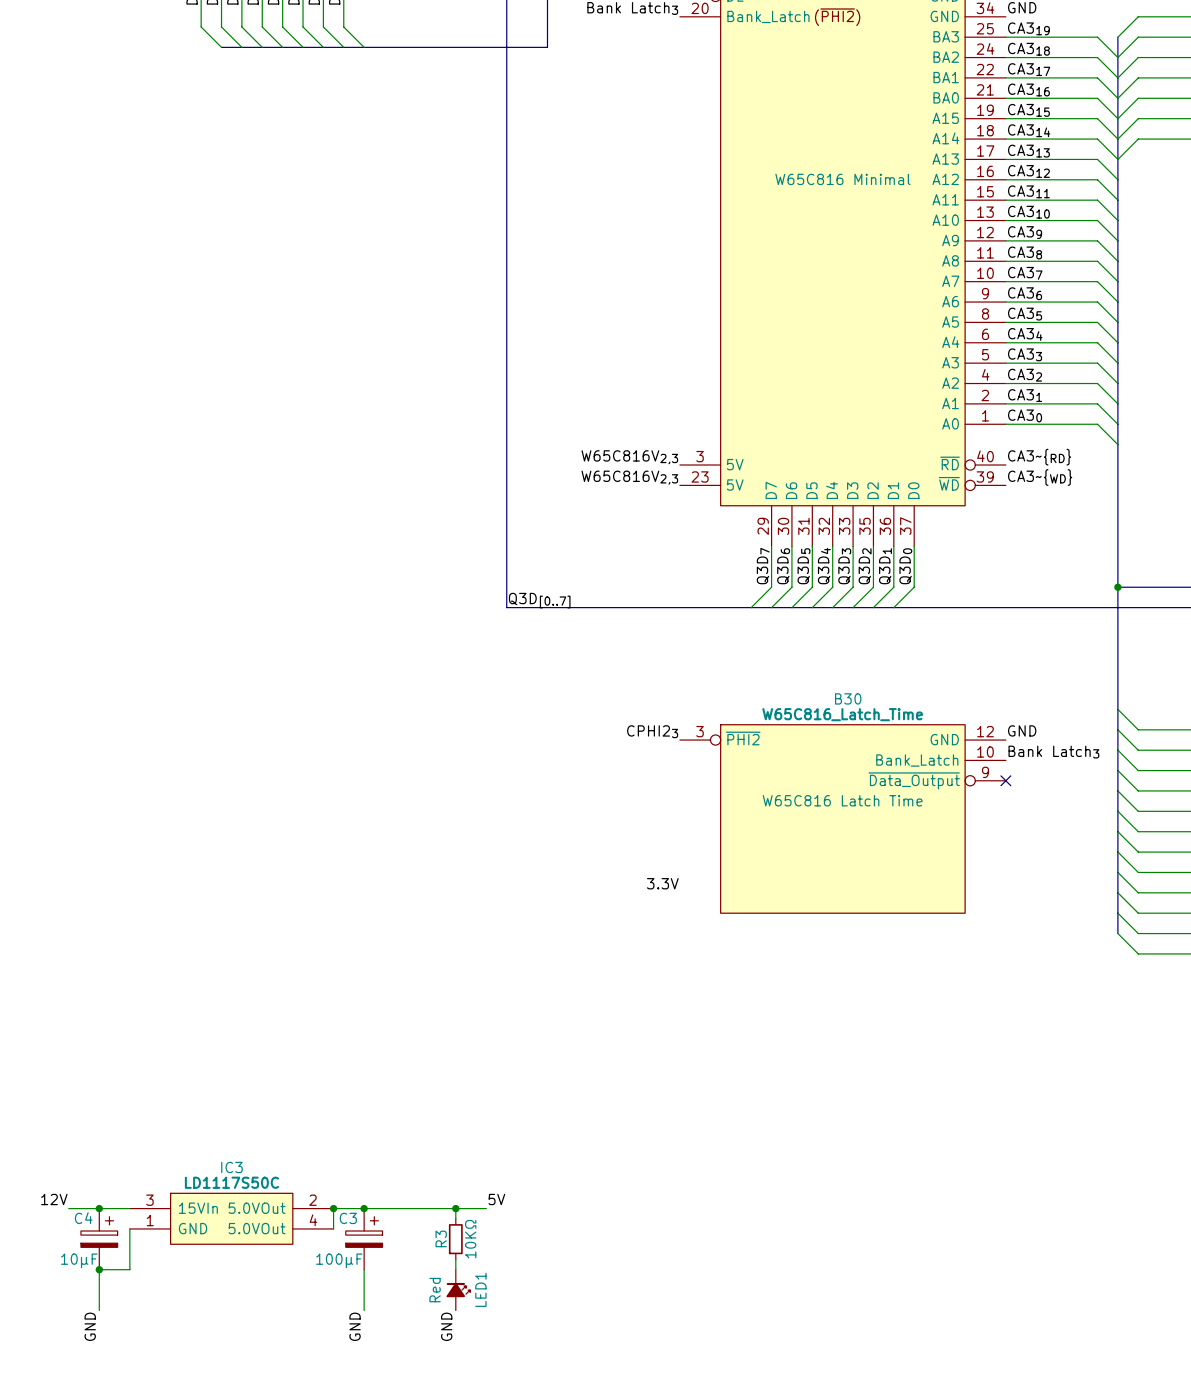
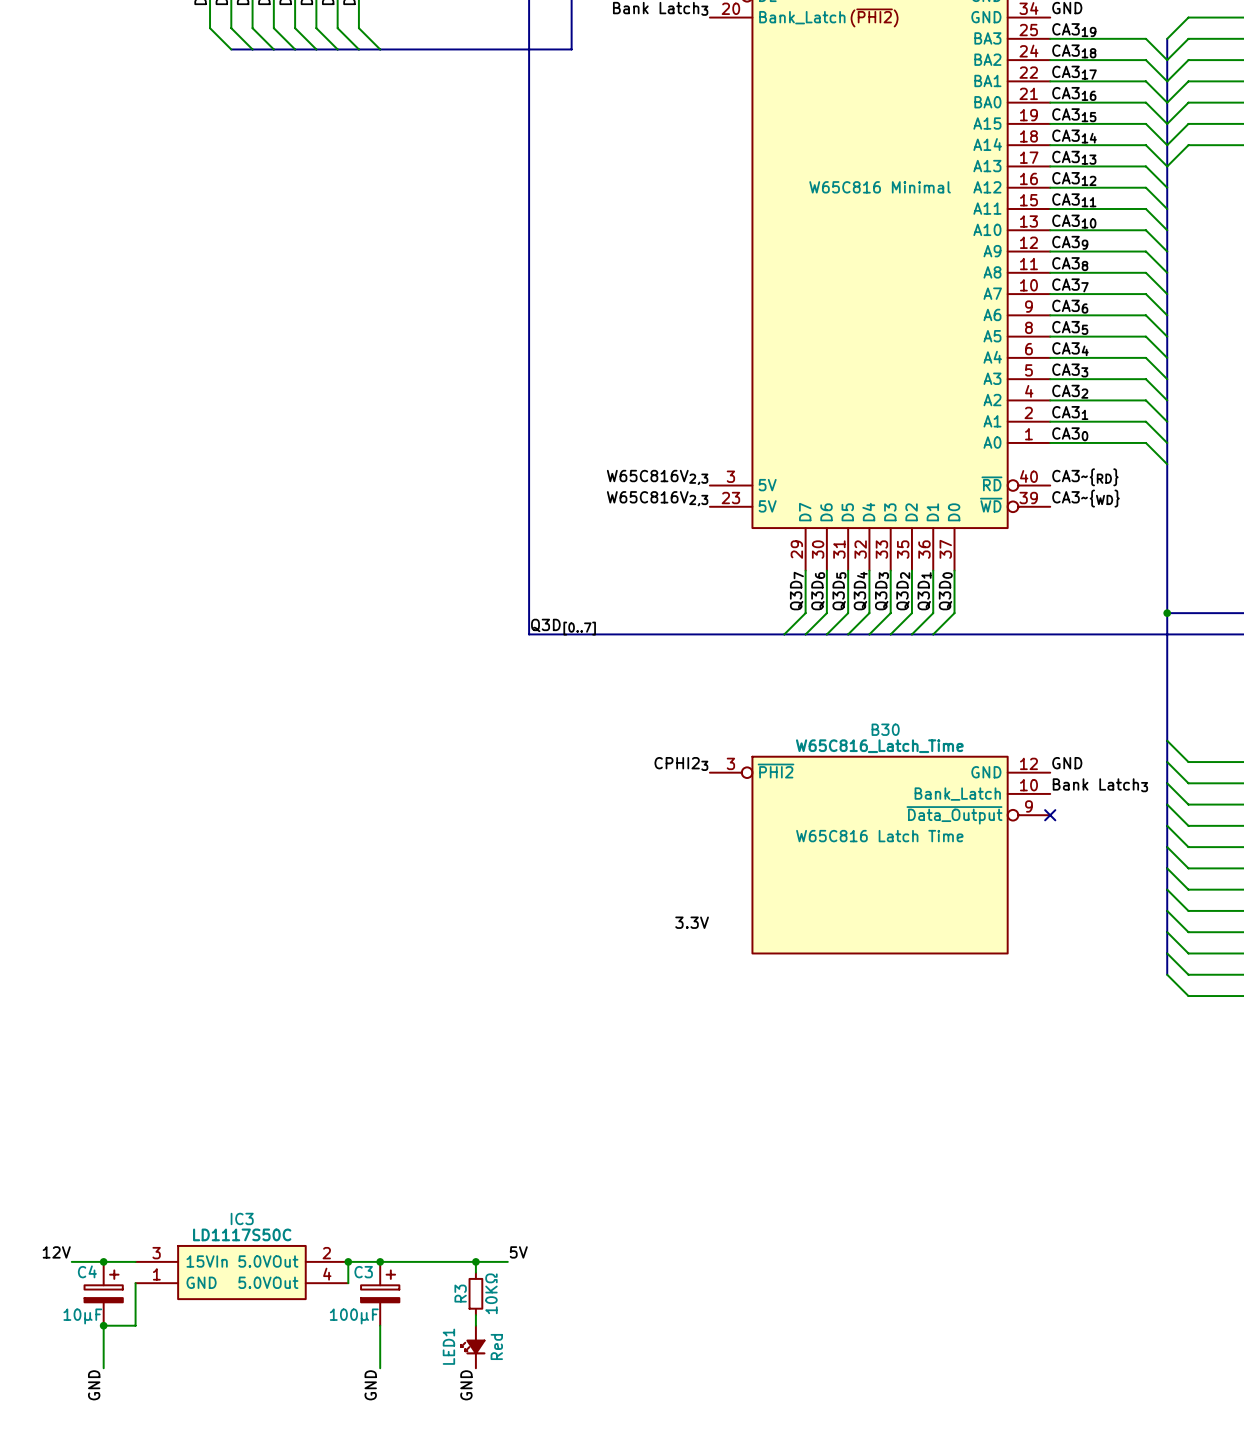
LED1 rotation: 0° (458, 1290) -> 180° (473, 1346)

